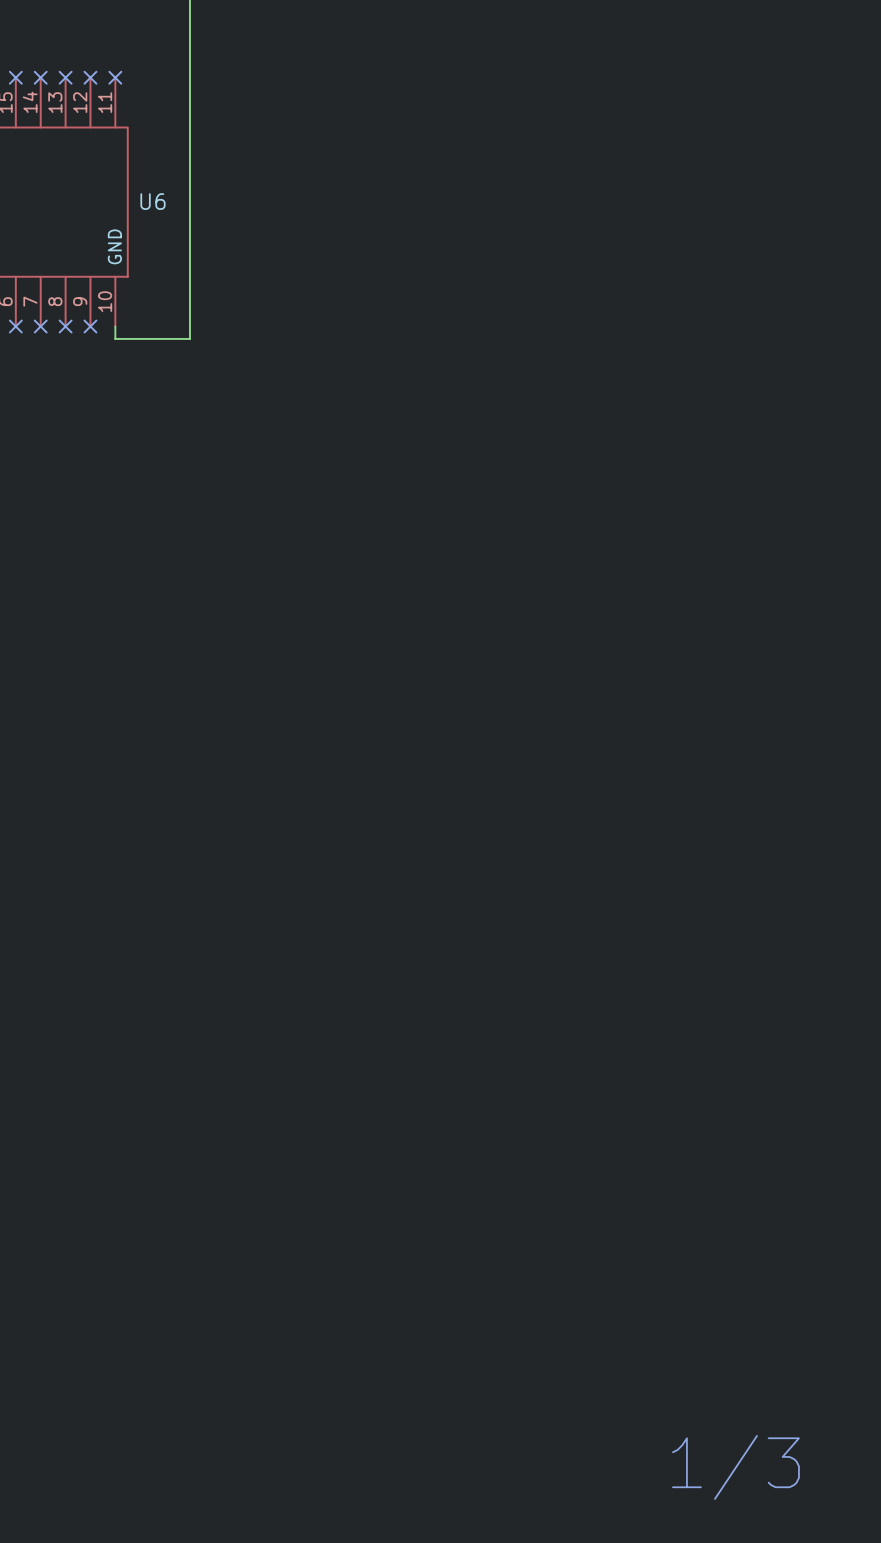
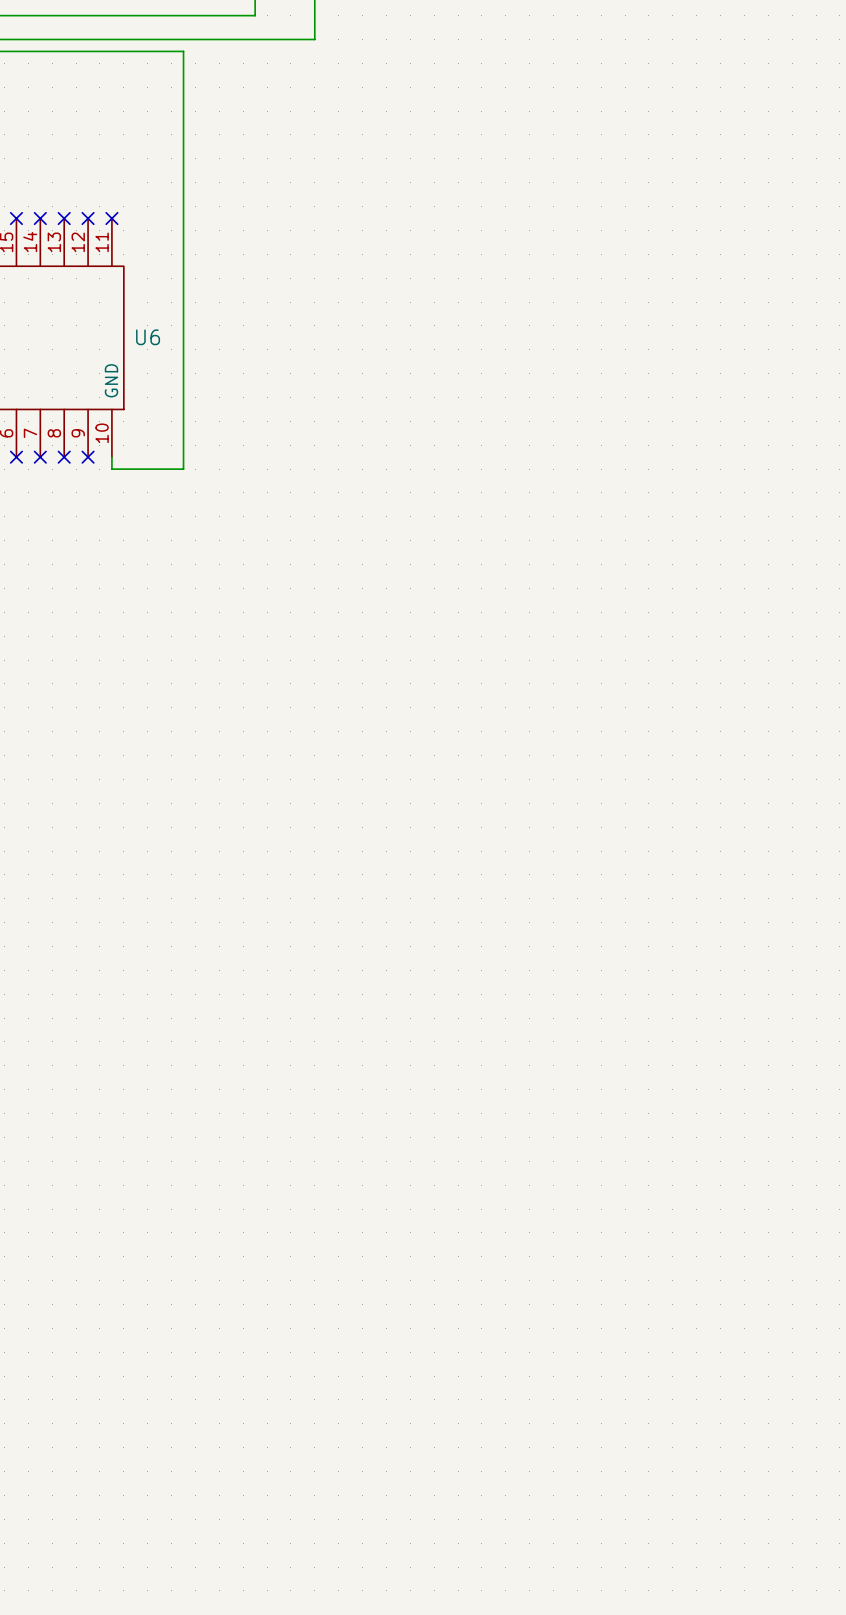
text: 1/3 (735, 1467) -> none

